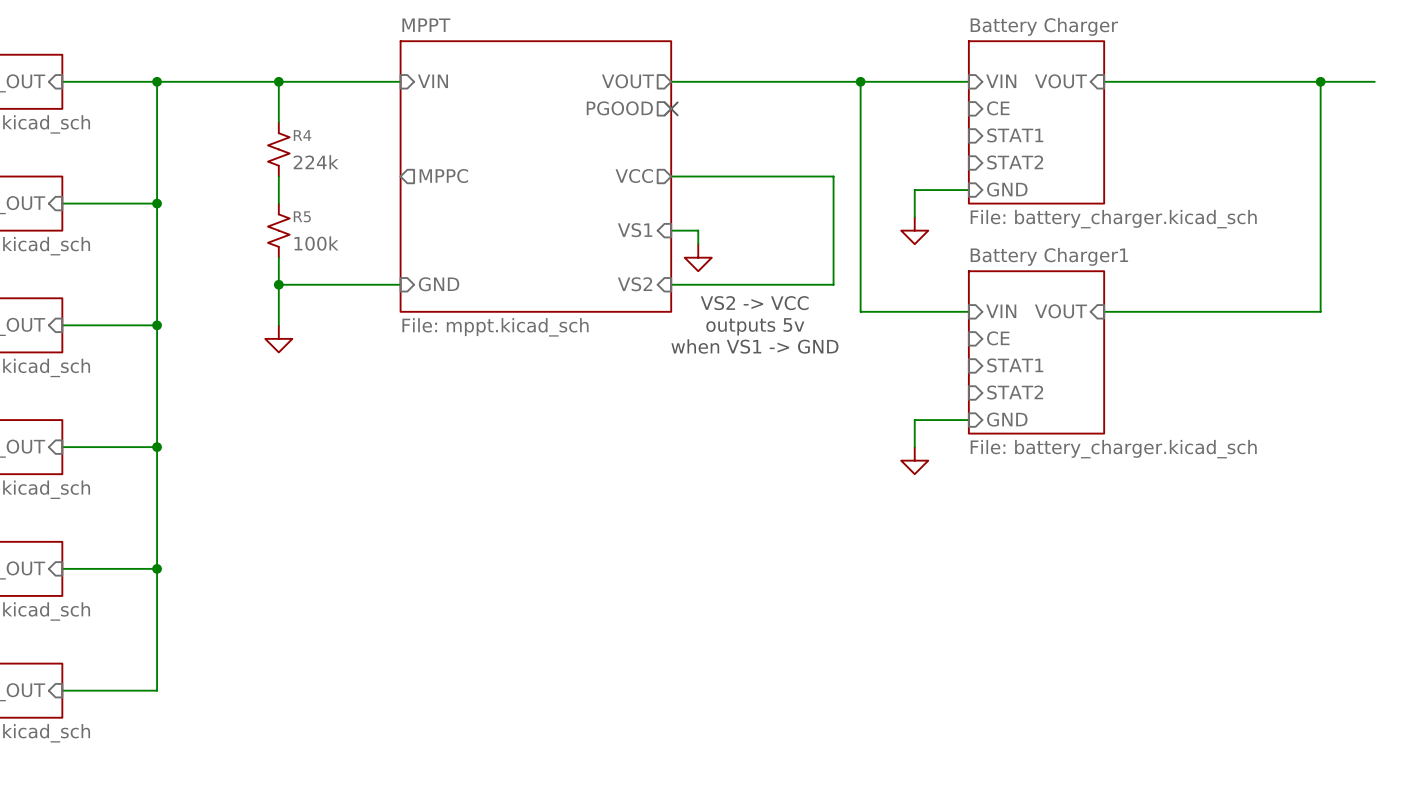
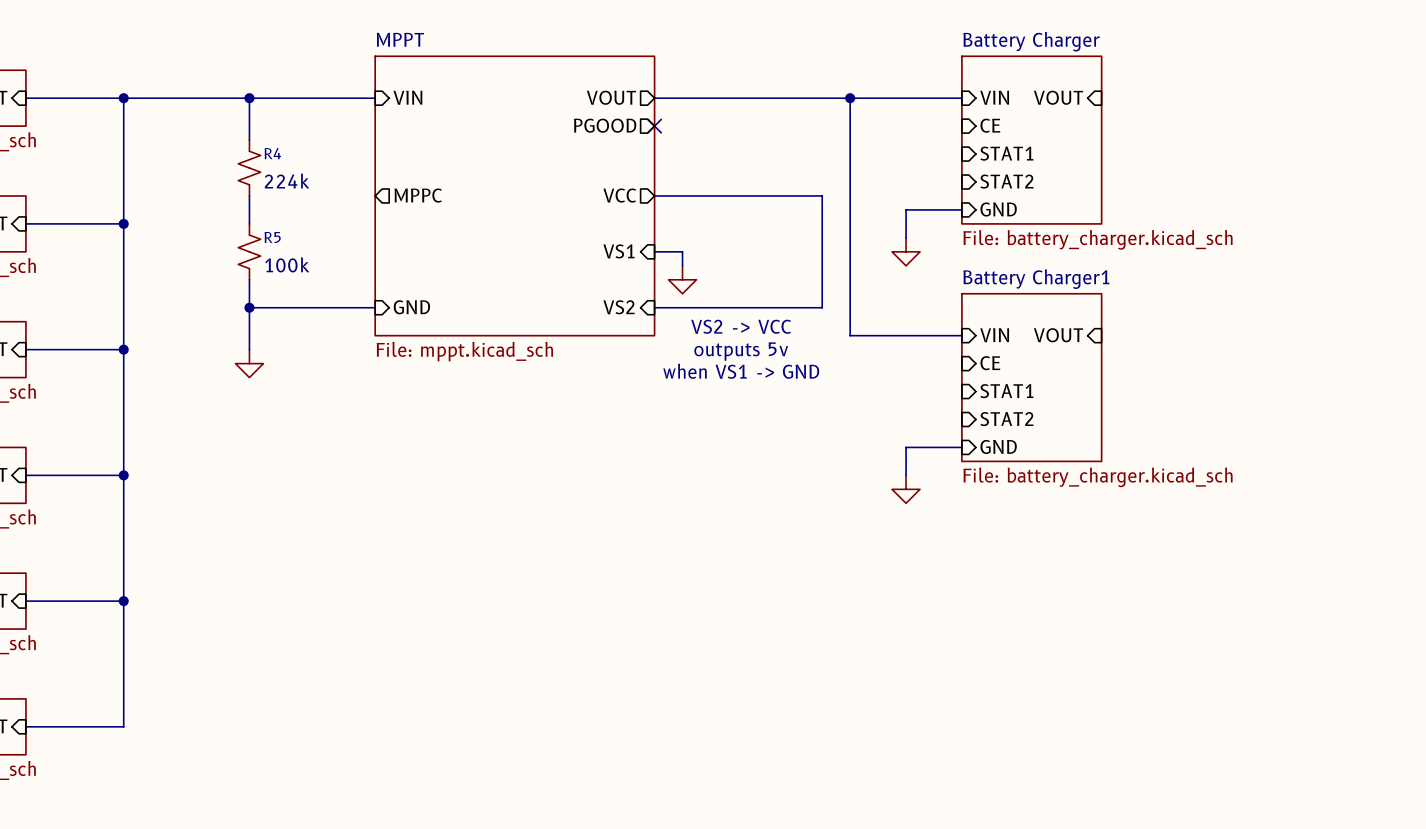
wire: (1104, 81) (1374, 81) -> none
wire: (1320, 81) (1320, 311) (1104, 311) -> none
junction: (1320, 81) -> none

